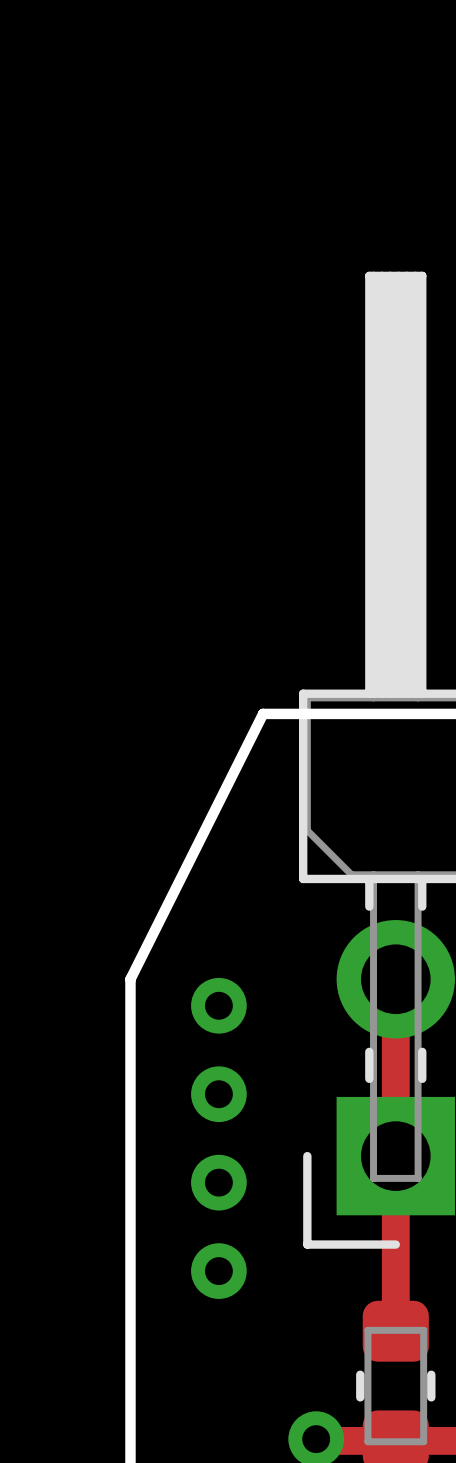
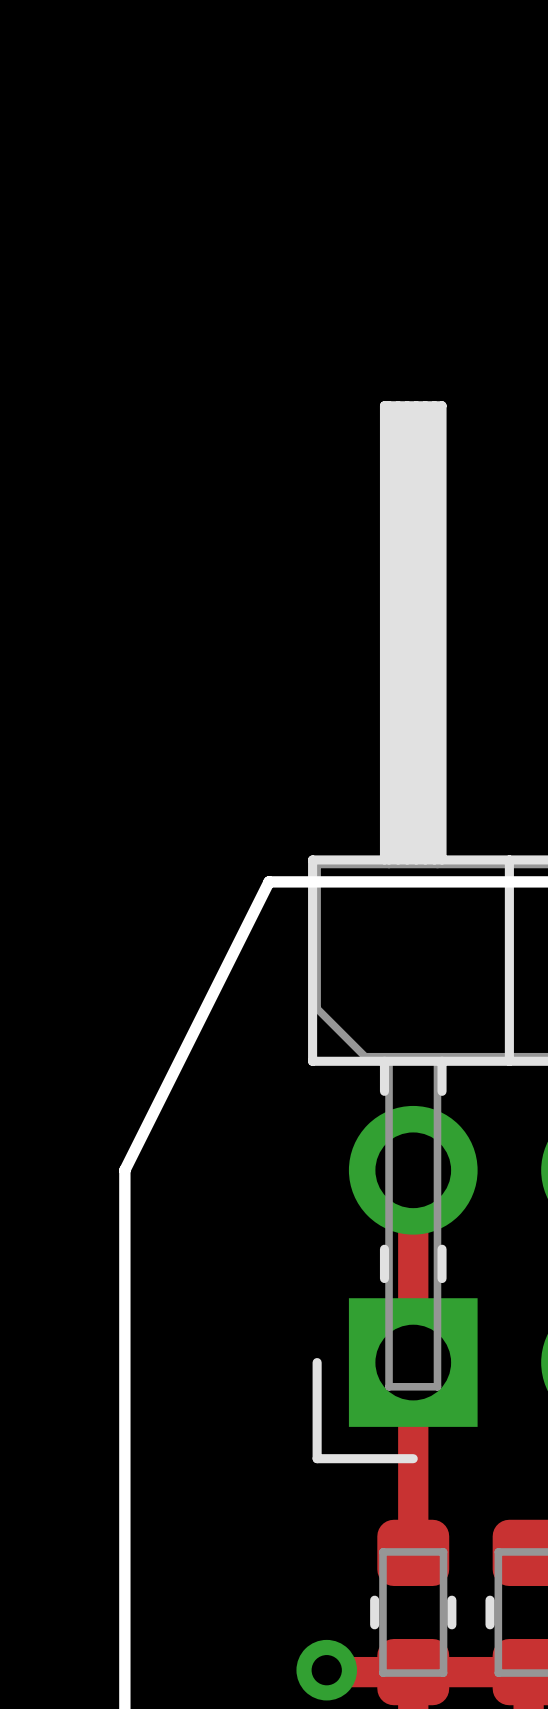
via: (218, 1005) -> none
via: (218, 1094) -> none
via: (218, 1182) -> none
via: (218, 1271) -> none

